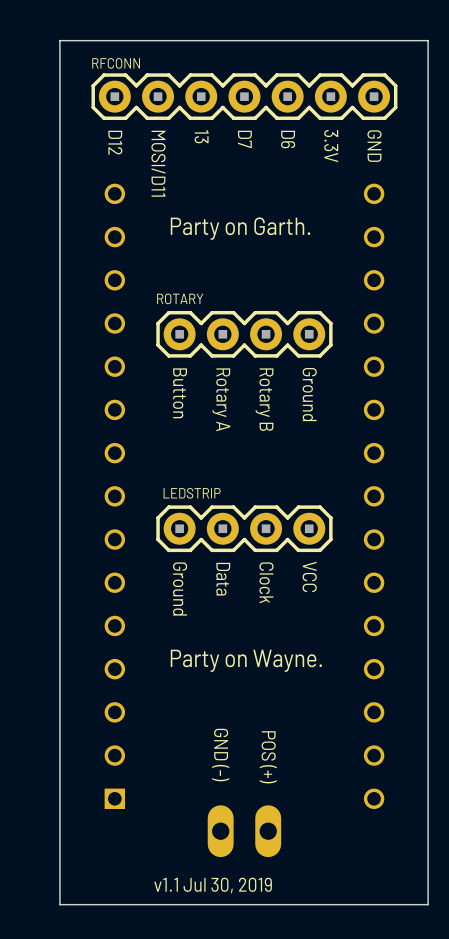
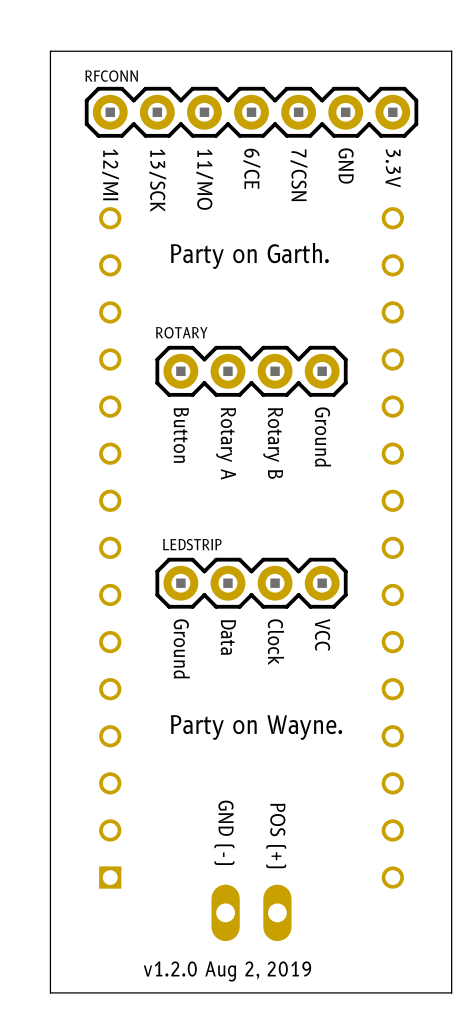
text: 13 (201, 136) -> 11/MO (204, 179)
text: D7 (244, 139) -> 6/CE (251, 168)
text: D6 (288, 139) -> 7/CSN (298, 175)
text: D12 (115, 142) -> 12/MI (110, 174)
text: 3.3V (331, 146) -> GND (346, 166)
text: GND (374, 146) -> 3.3V (393, 168)
text: MOSI/D11 (158, 163) -> 13/SCK (157, 180)
text: v1.1 Jul 30, 2019 (213, 885) -> v1.2.0 Aug 2, 2019 (227, 971)

